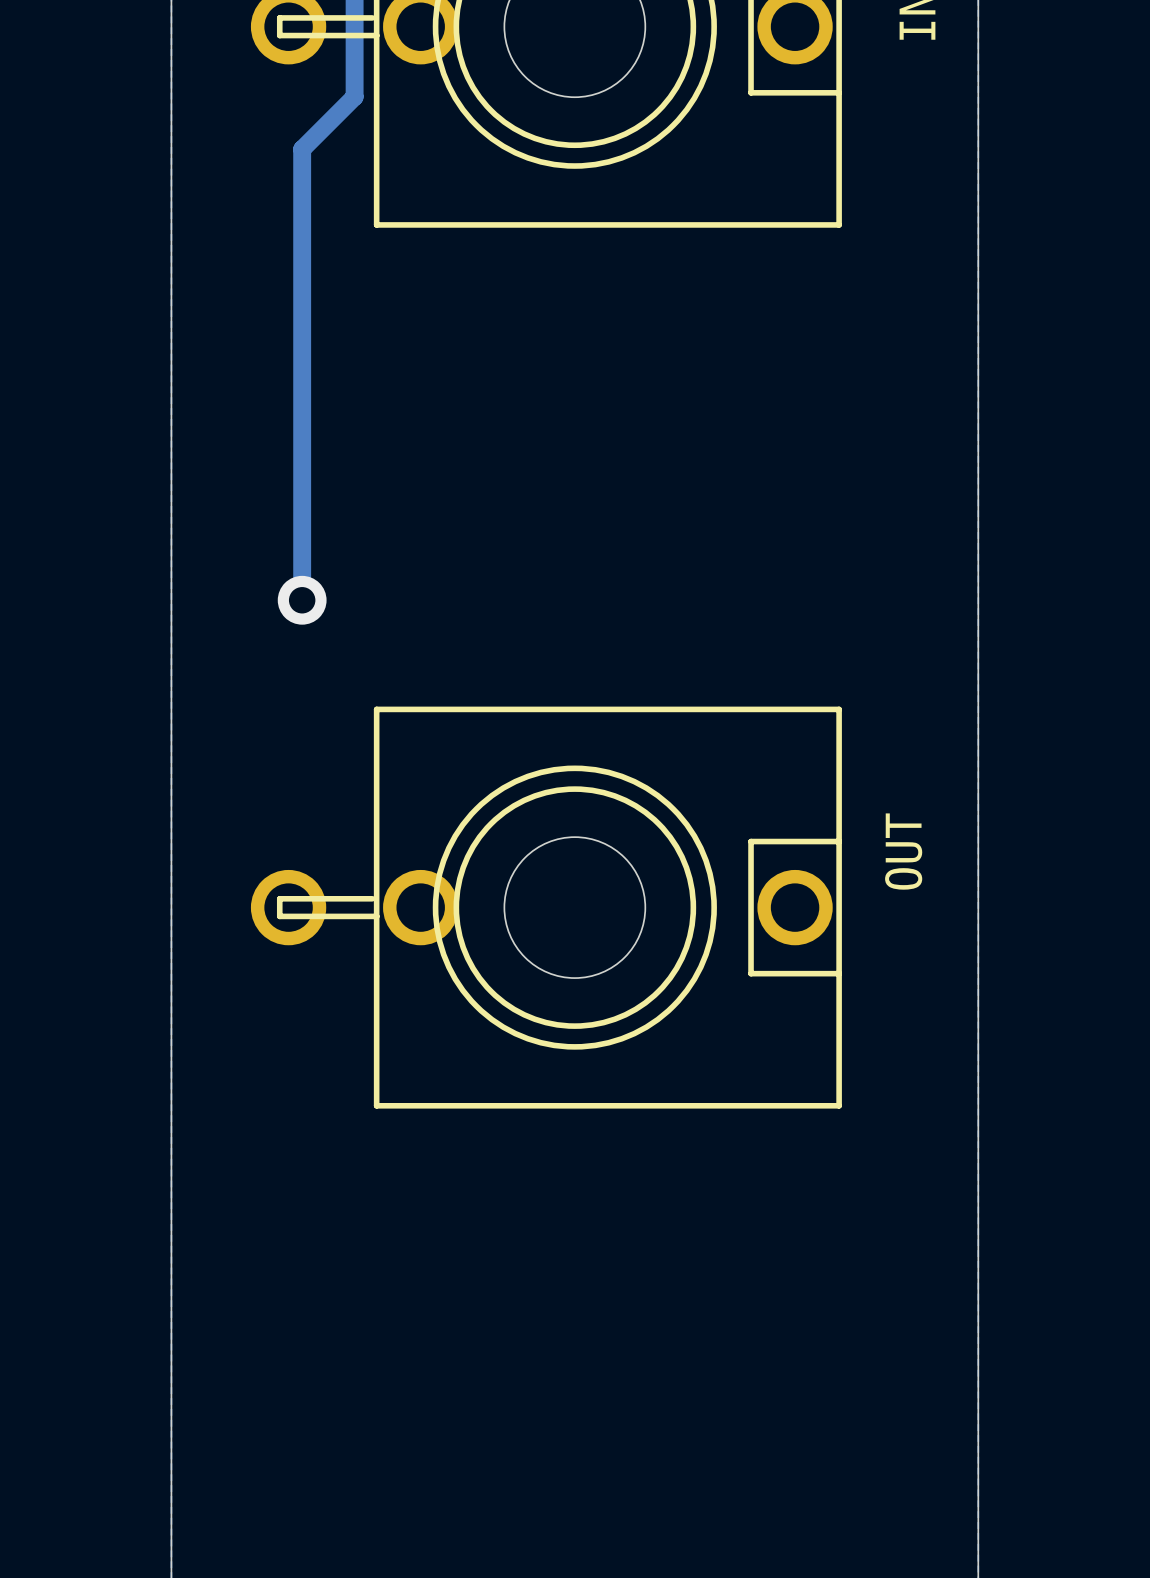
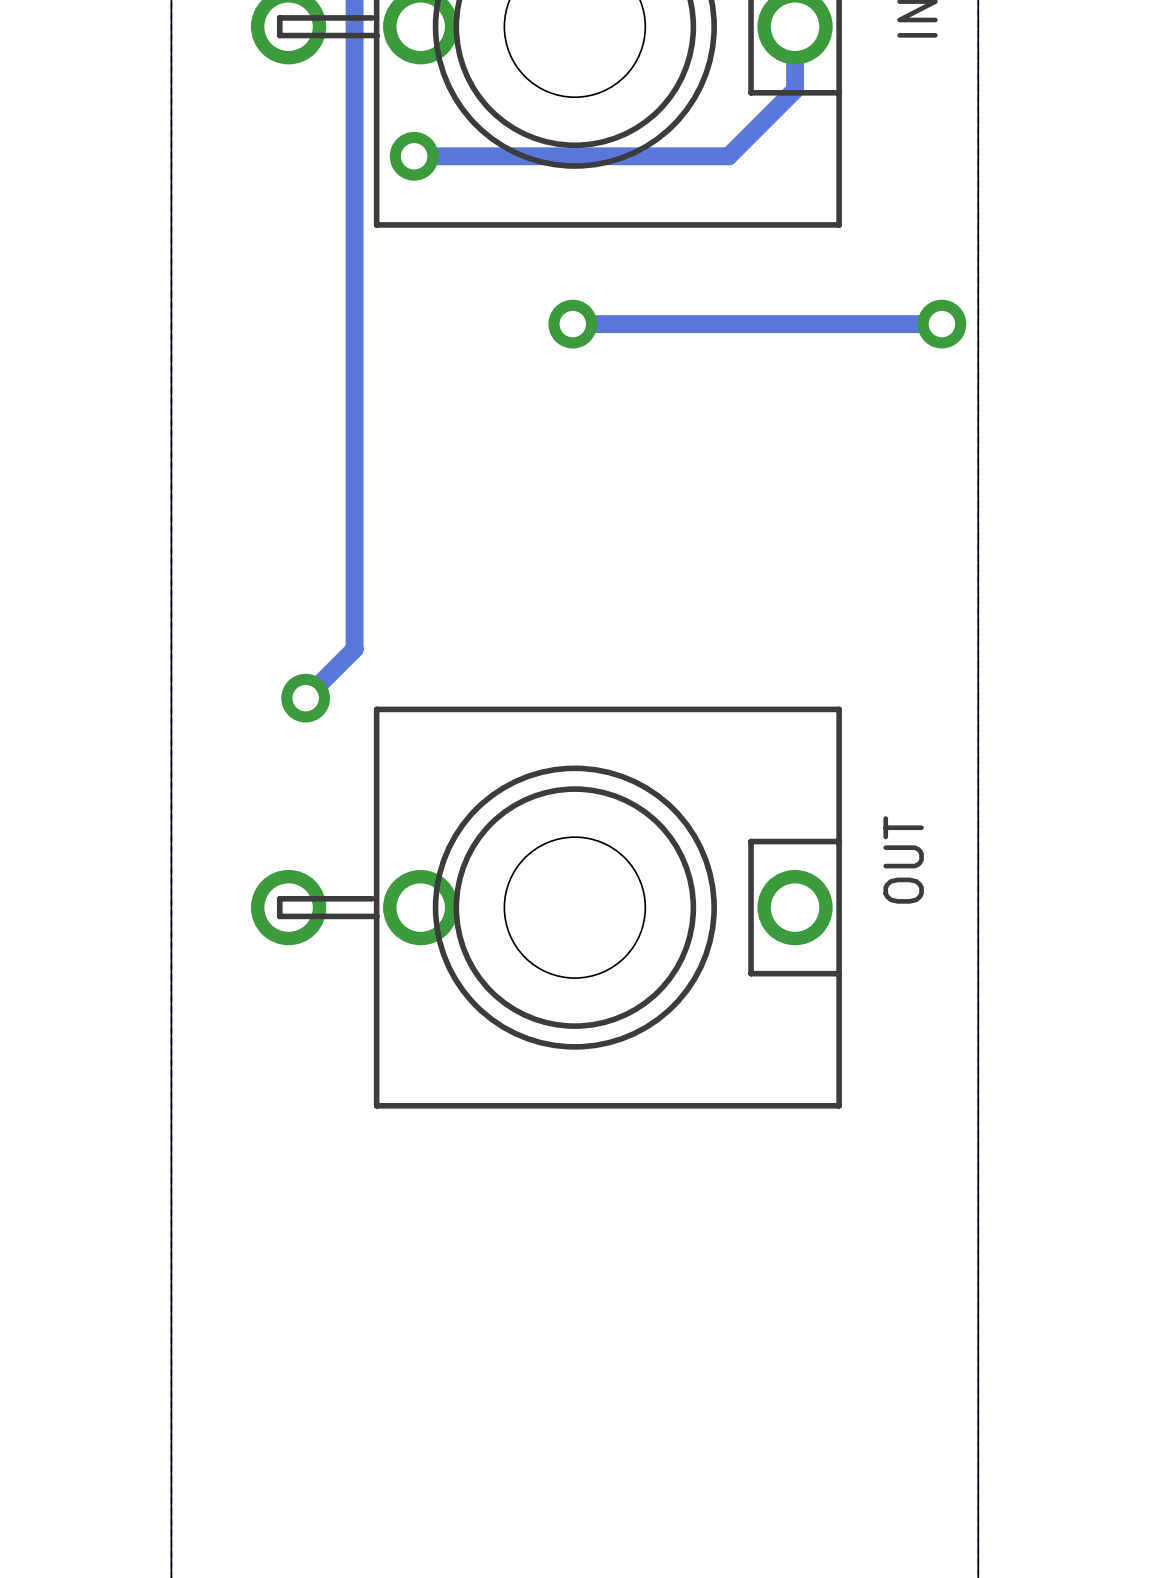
track: none -> (795, 26) (795, 89) (728, 156) (414, 156)
track: (354, 96) (302, 149) (302, 600) -> (354, 96) (354, 649) (305, 698)
via: none -> (414, 156)
via: none -> (572, 324)
track: none -> (941, 324) (572, 324)
via: none -> (941, 324)
via position: (302, 600) -> (305, 698)

